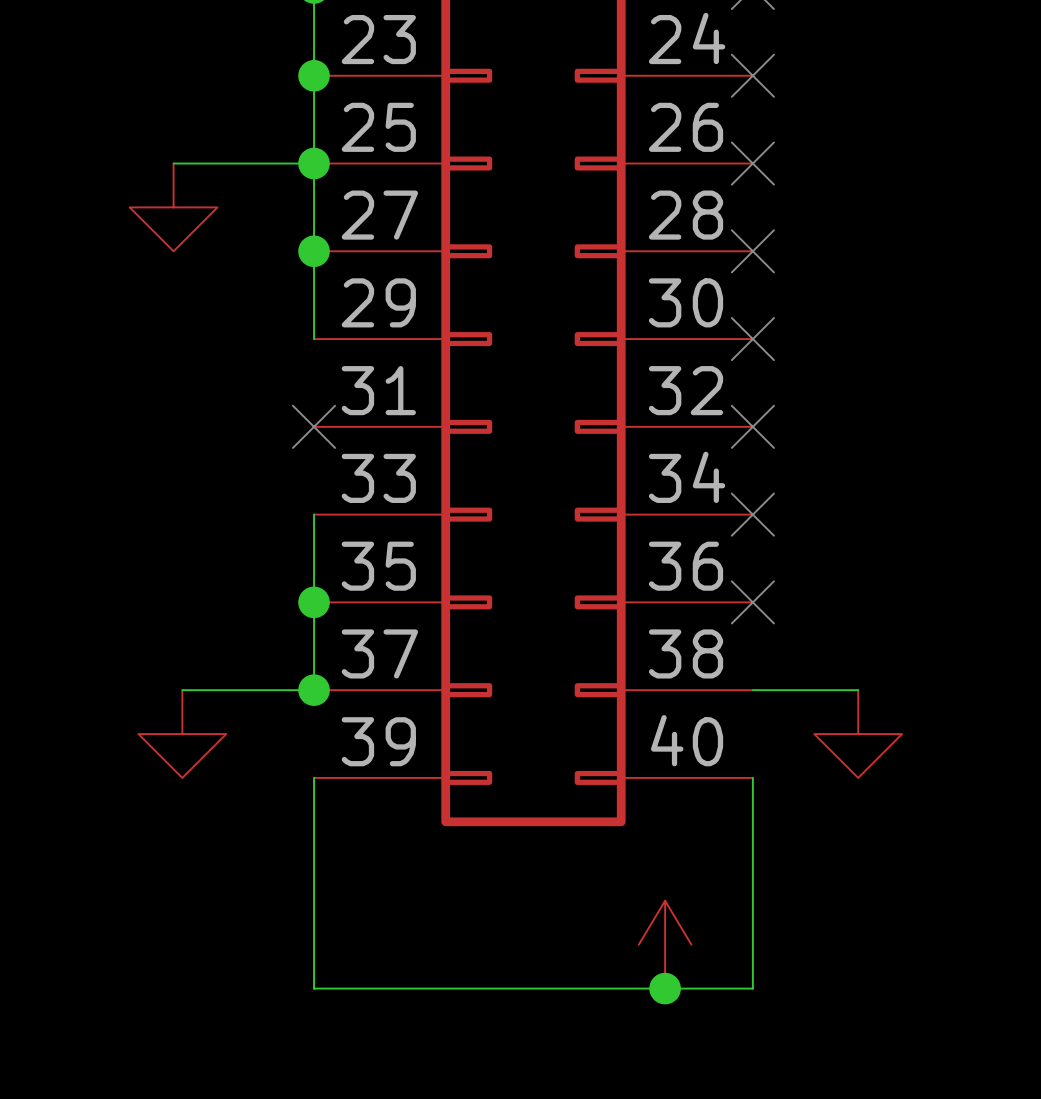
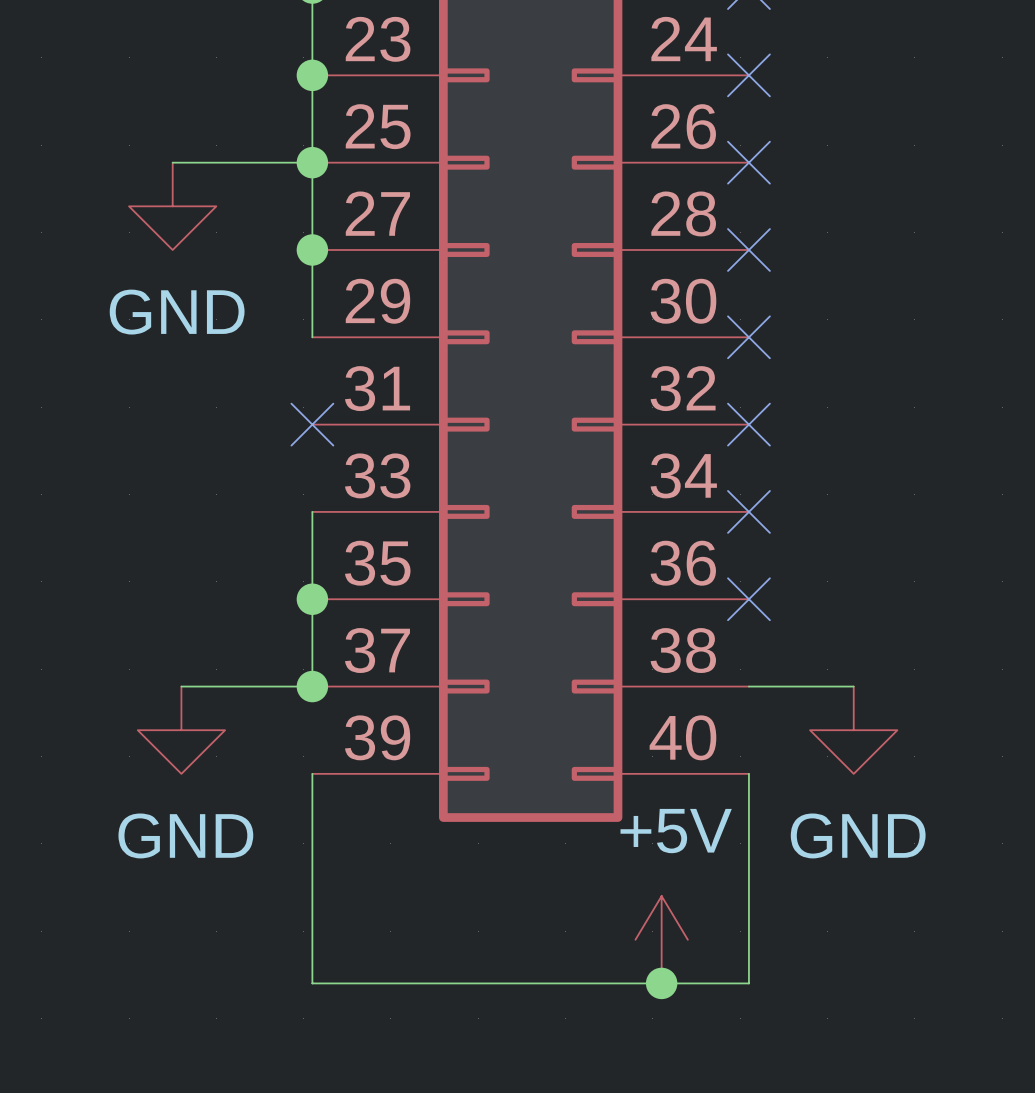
power symbol text: none -> GND (177, 312)
power symbol text: none -> +5V (676, 831)
power symbol text: none -> GND (185, 835)
power symbol text: none -> GND (858, 835)

